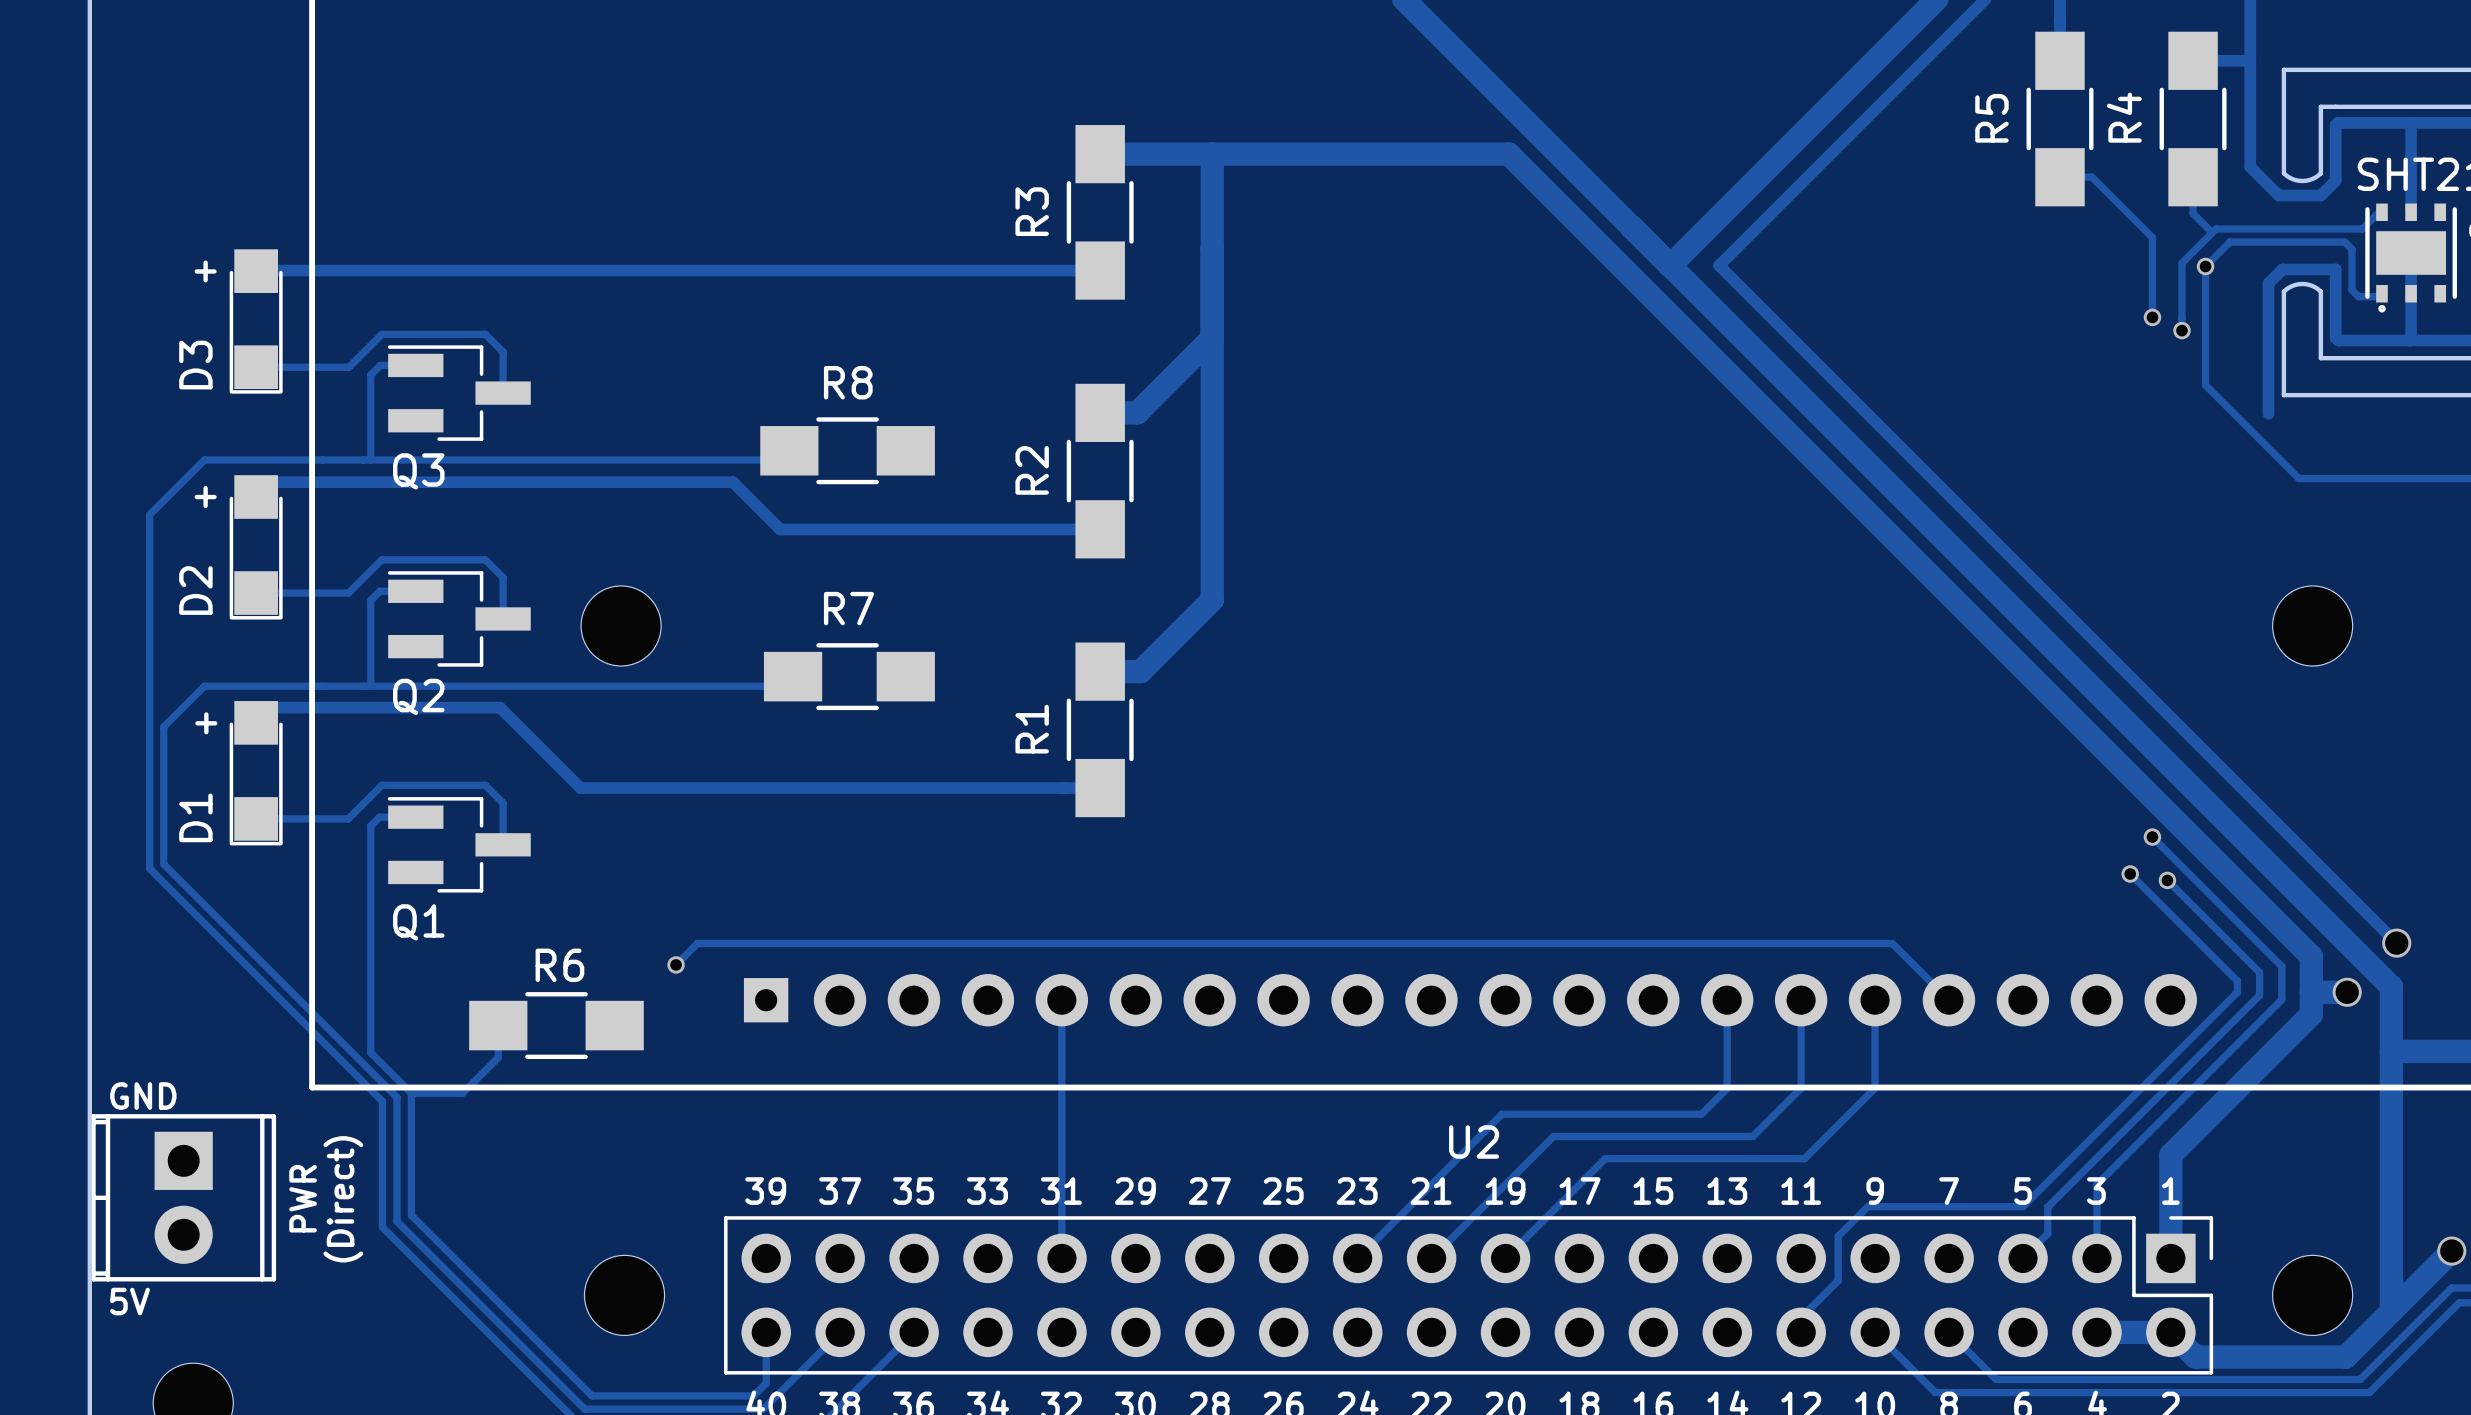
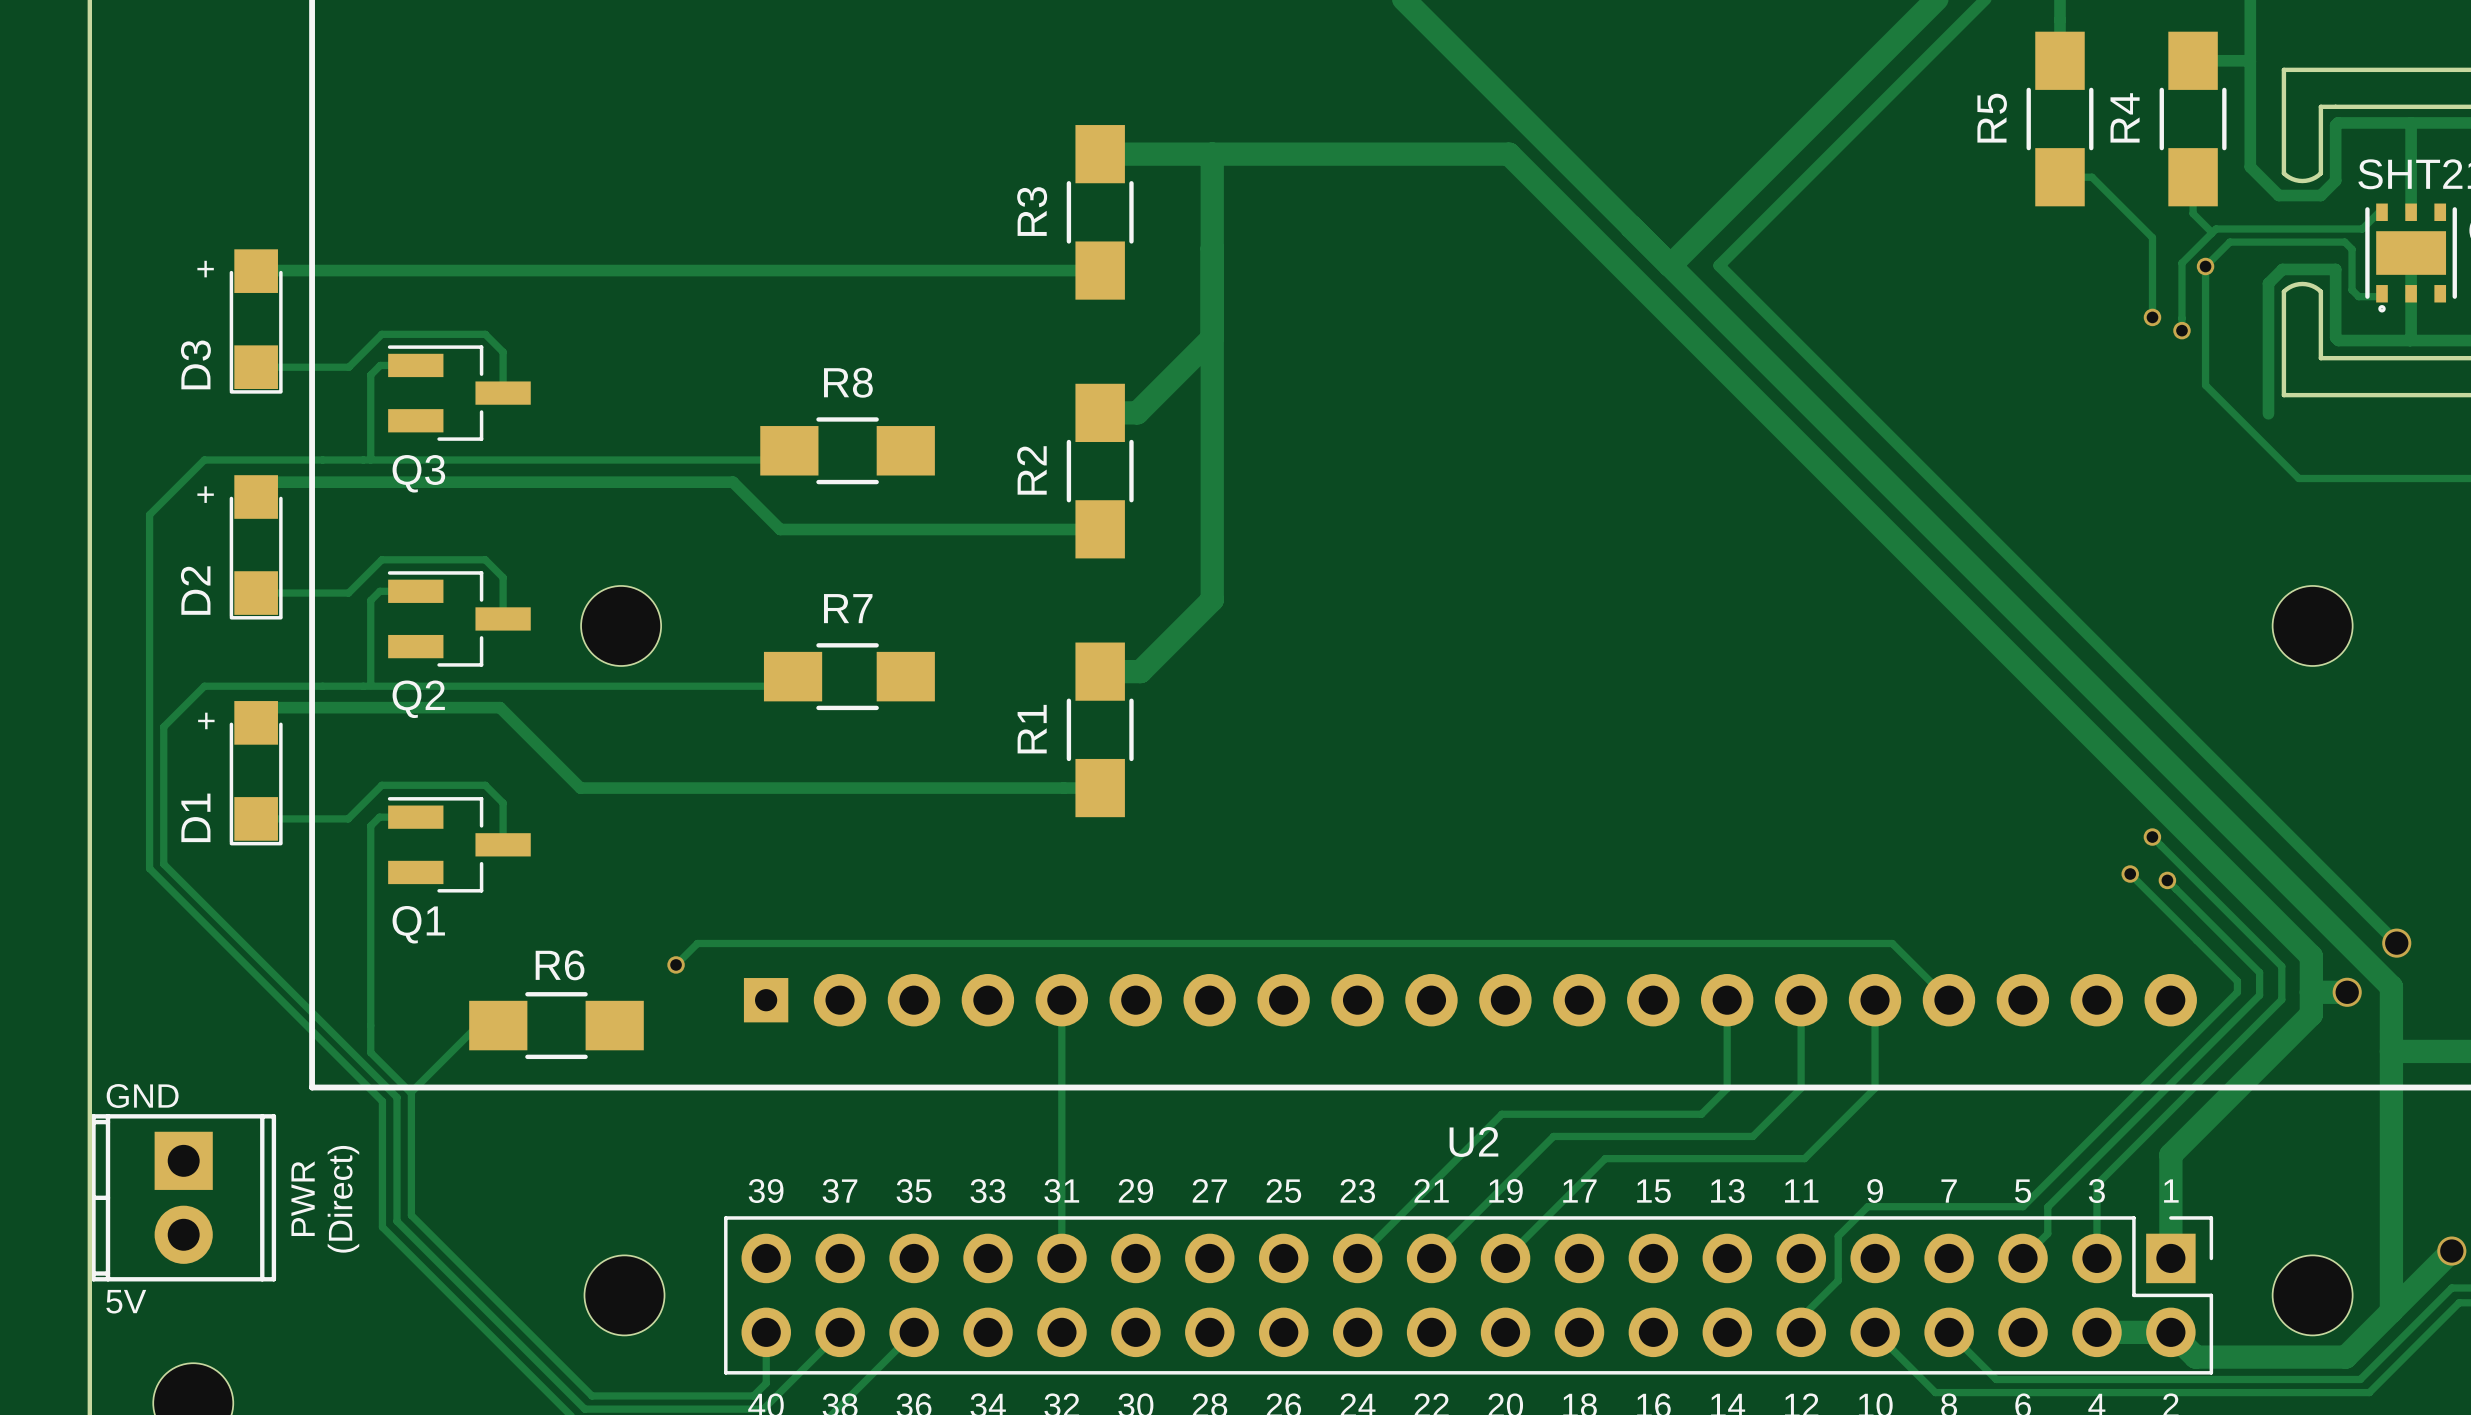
track: (498, 1025) (498, 1057) (462, 1093) (411, 1093) -> (498, 1025) (477, 1025) (411, 1093)

